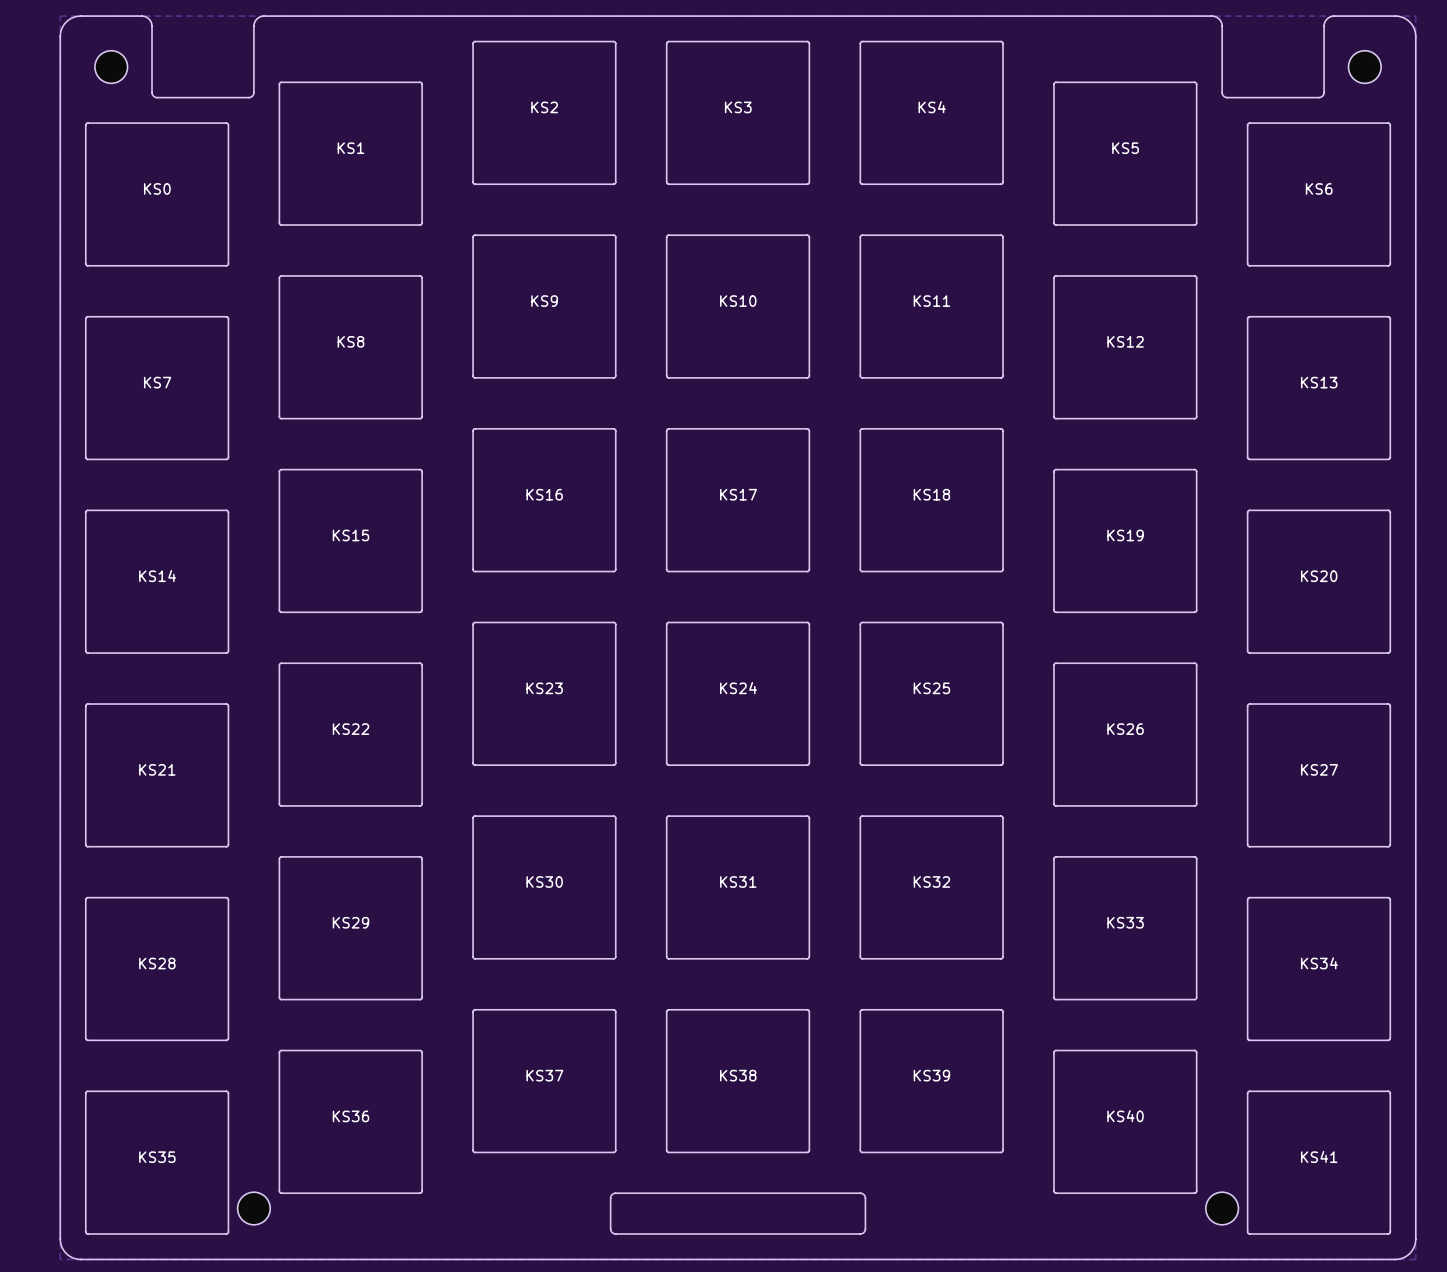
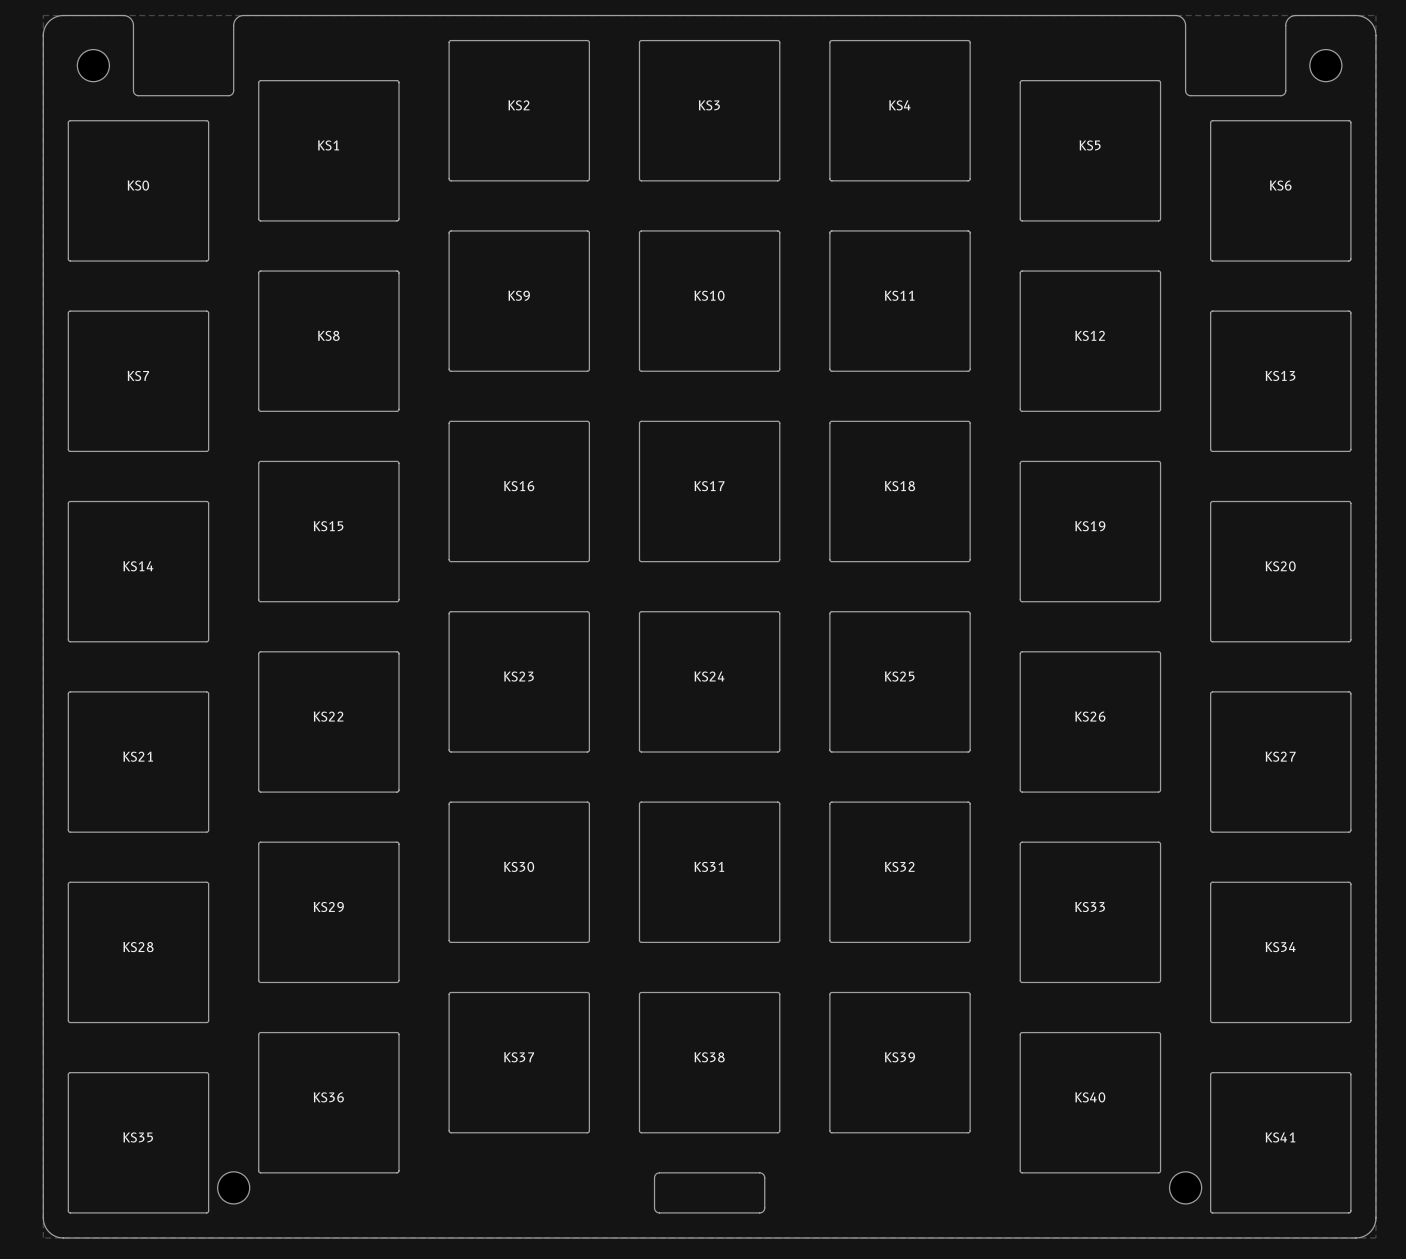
board edge: (687, 1193) (615, 1193) (610, 1198) (610, 1229) (613, 1233) (687, 1233) -> (659, 1172) (654, 1177) (654, 1208) (659, 1212)
board edge: (788, 1193) (861, 1193) (865, 1198) (865, 1229) (862, 1233) (788, 1233) -> (759, 1172) (764, 1177) (764, 1208) (759, 1212)

